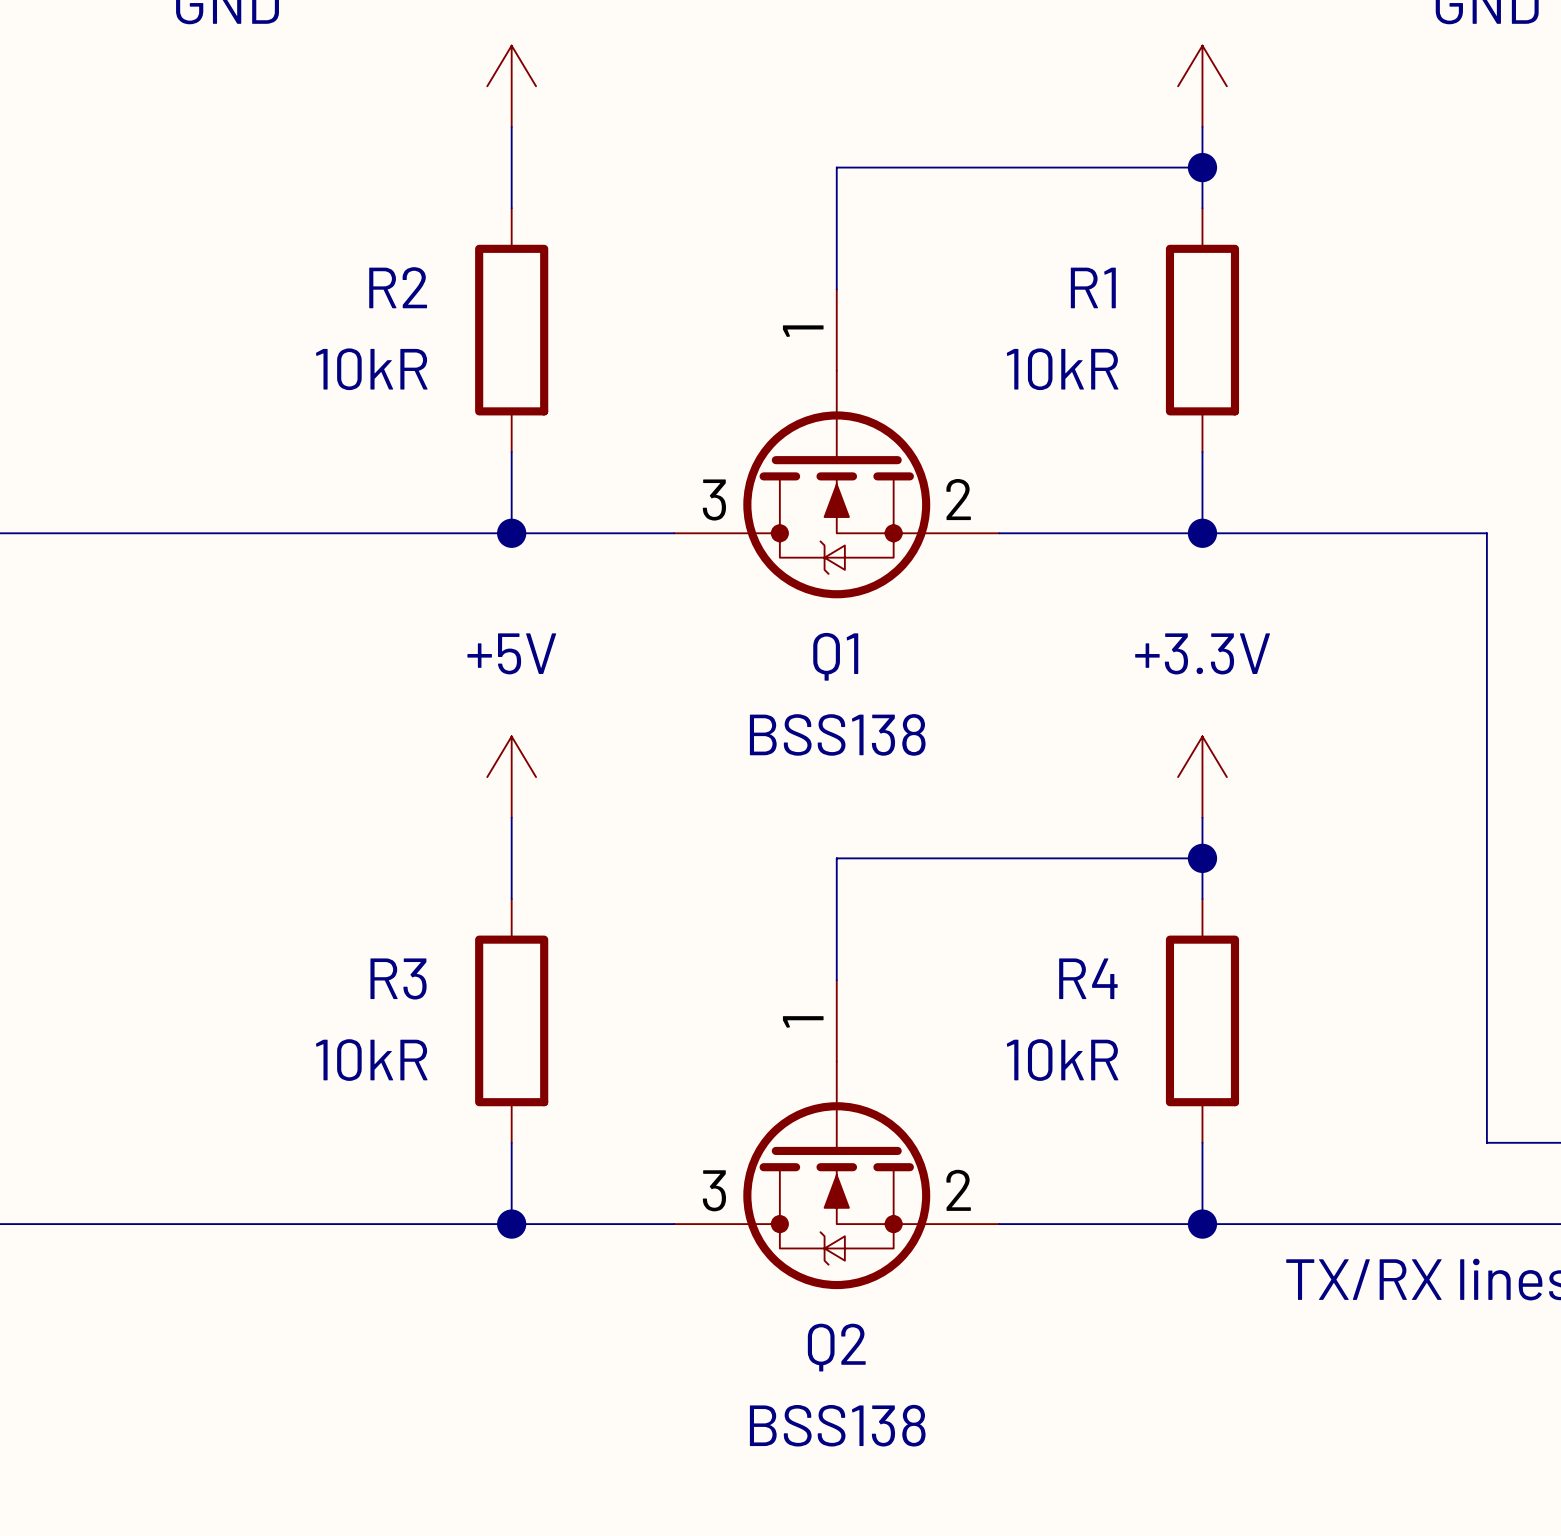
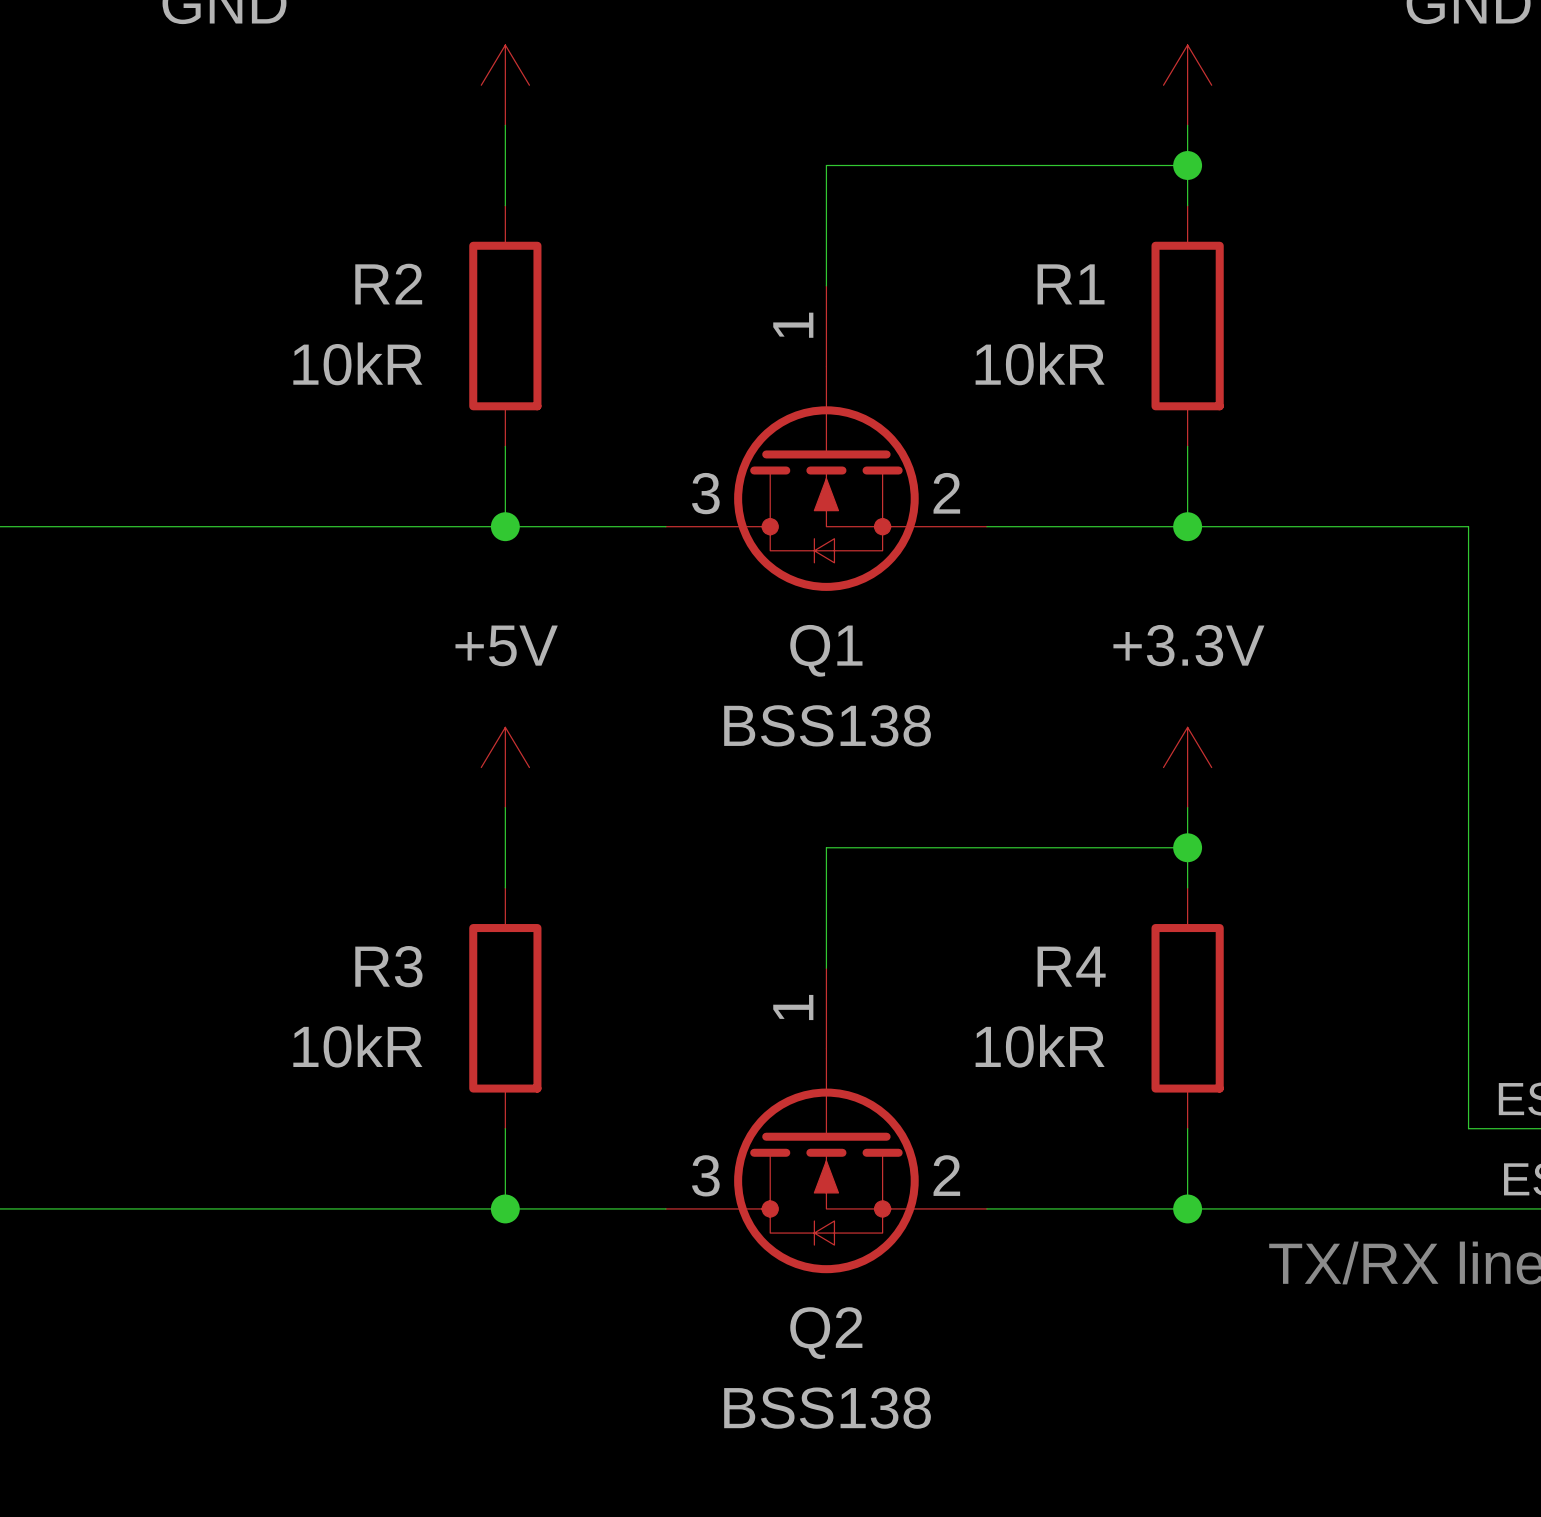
Q1 symbol: [674, 289, 1000, 599] -> [665, 285, 987, 591]
Q2 symbol: [674, 980, 1000, 1290] -> [665, 968, 987, 1274]

